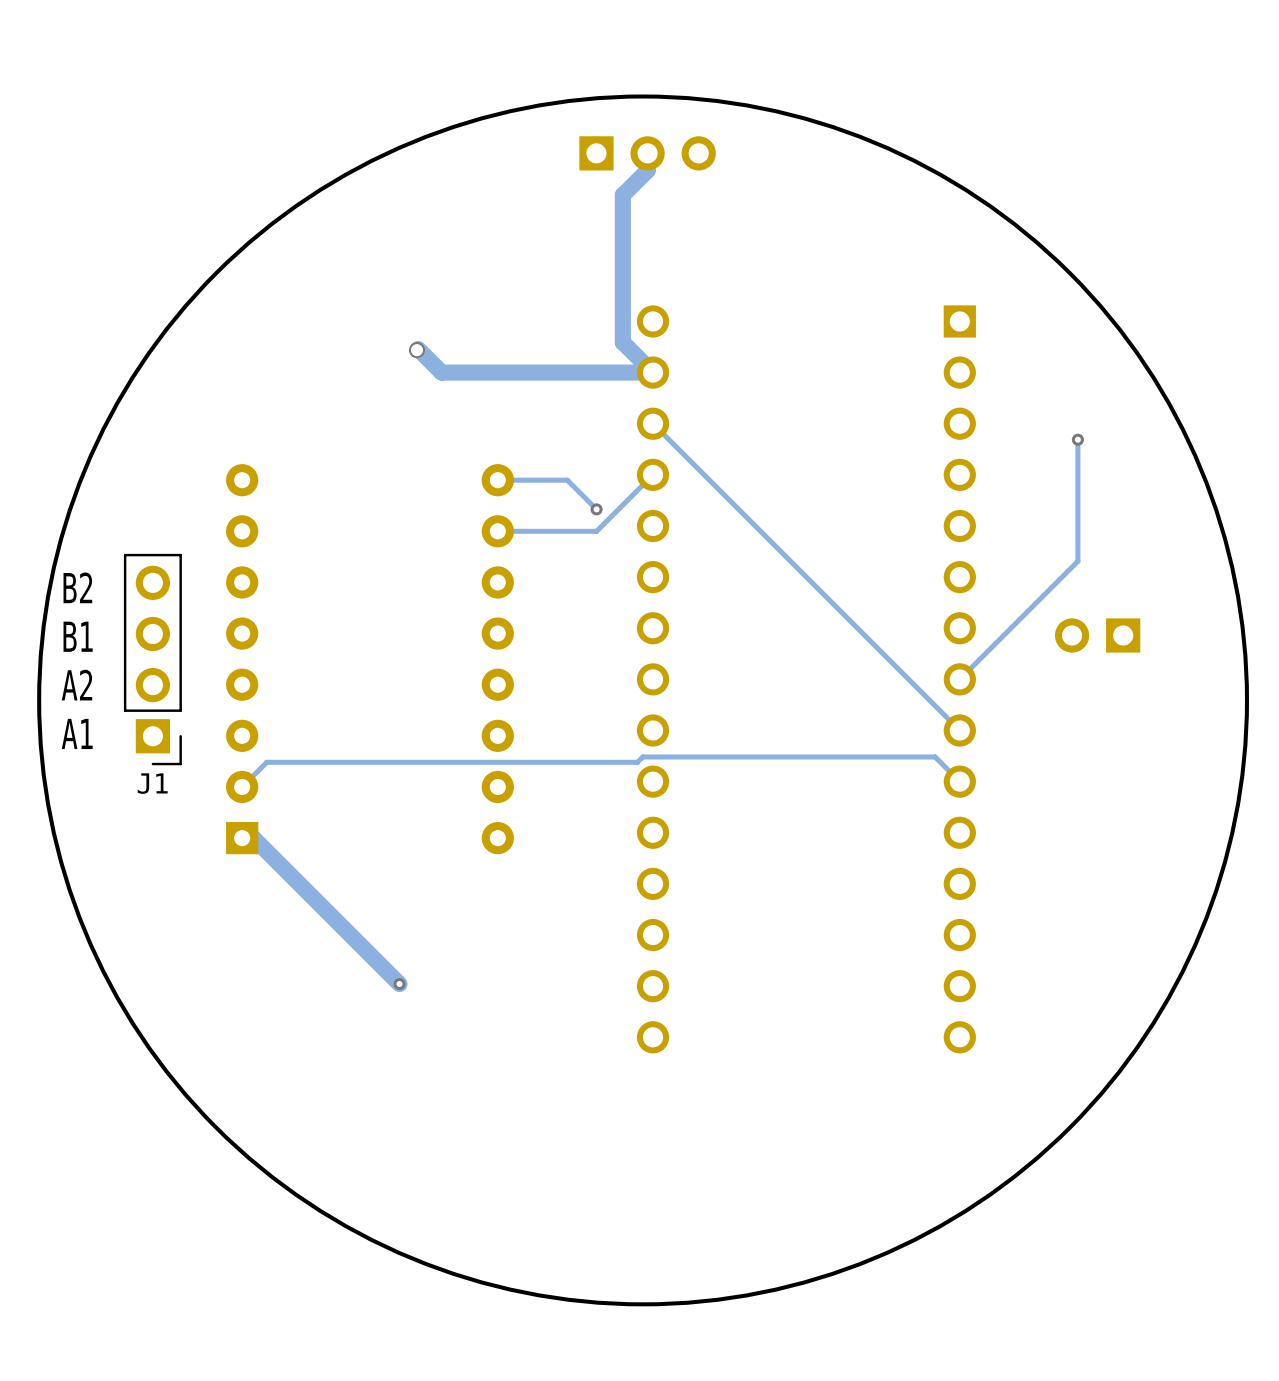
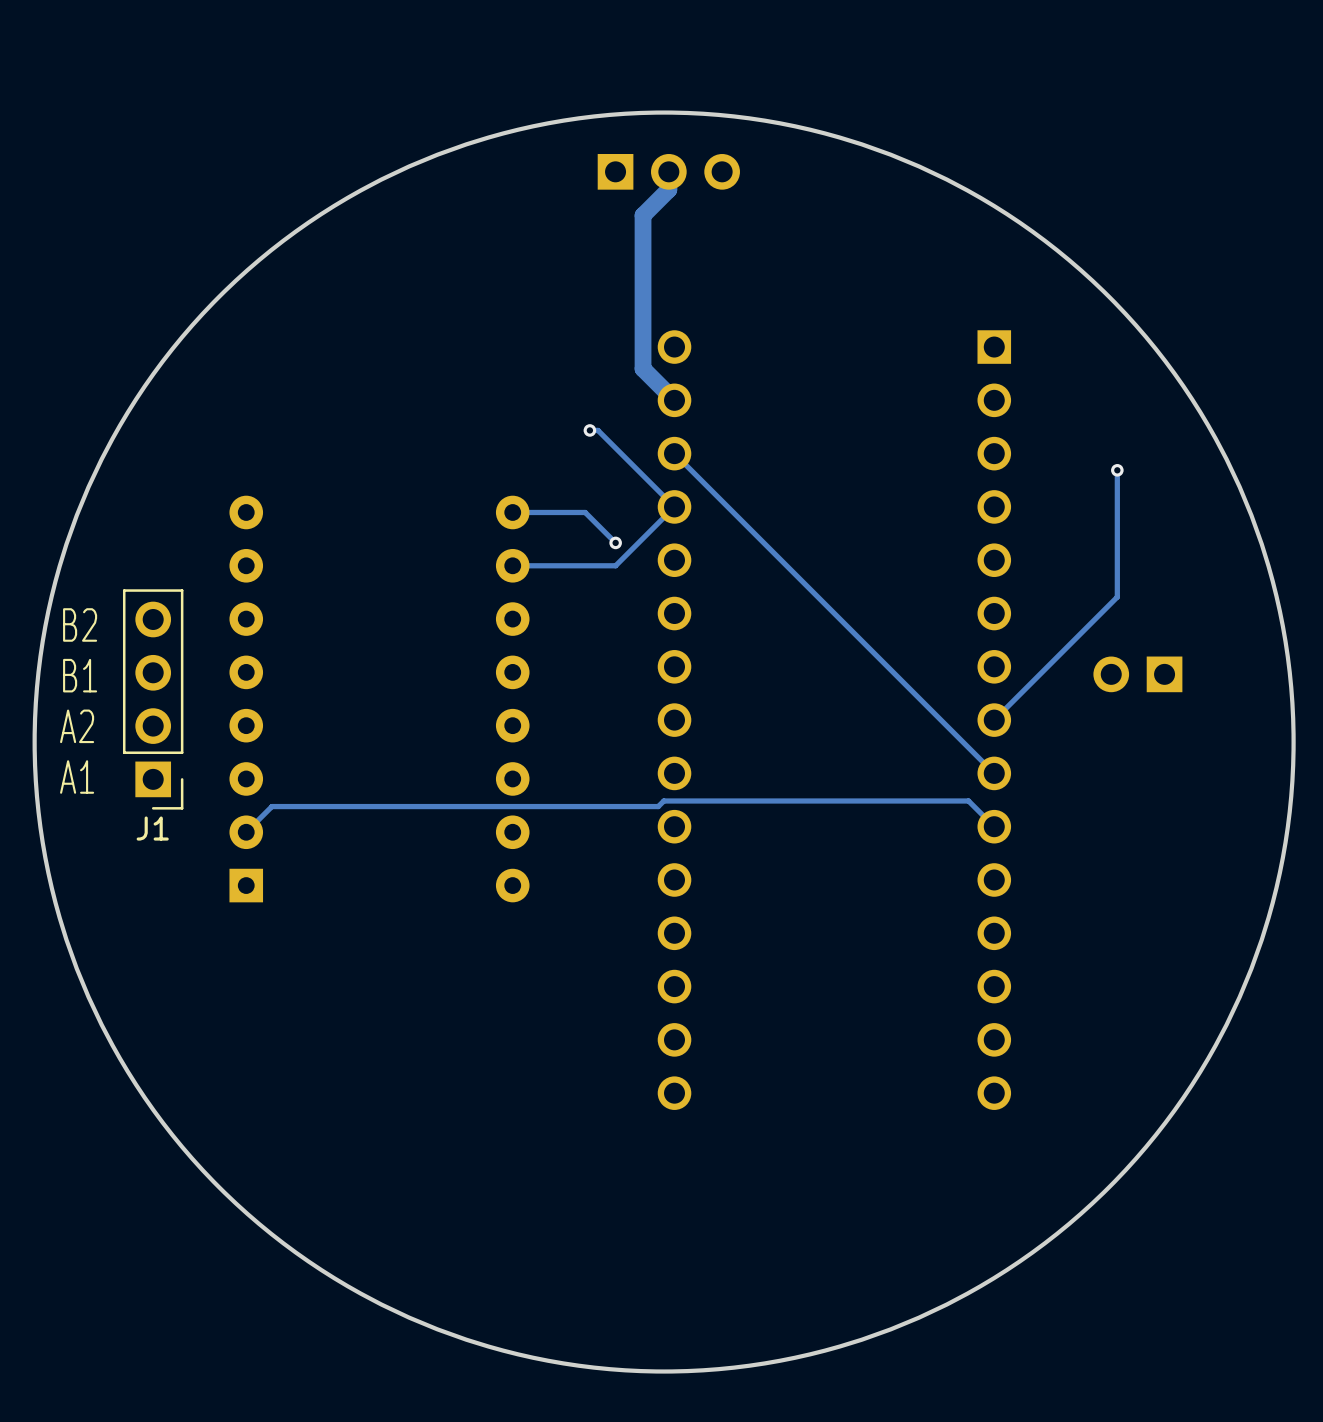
track: (418, 348) (441, 372) (653, 372) -> none
via: (417, 350) -> none
track: none -> (589, 430) (598, 430) (674, 506)
via: none -> (589, 430)
track: (242, 838) (253, 838) (399, 984) -> none
via: (399, 984) -> none

